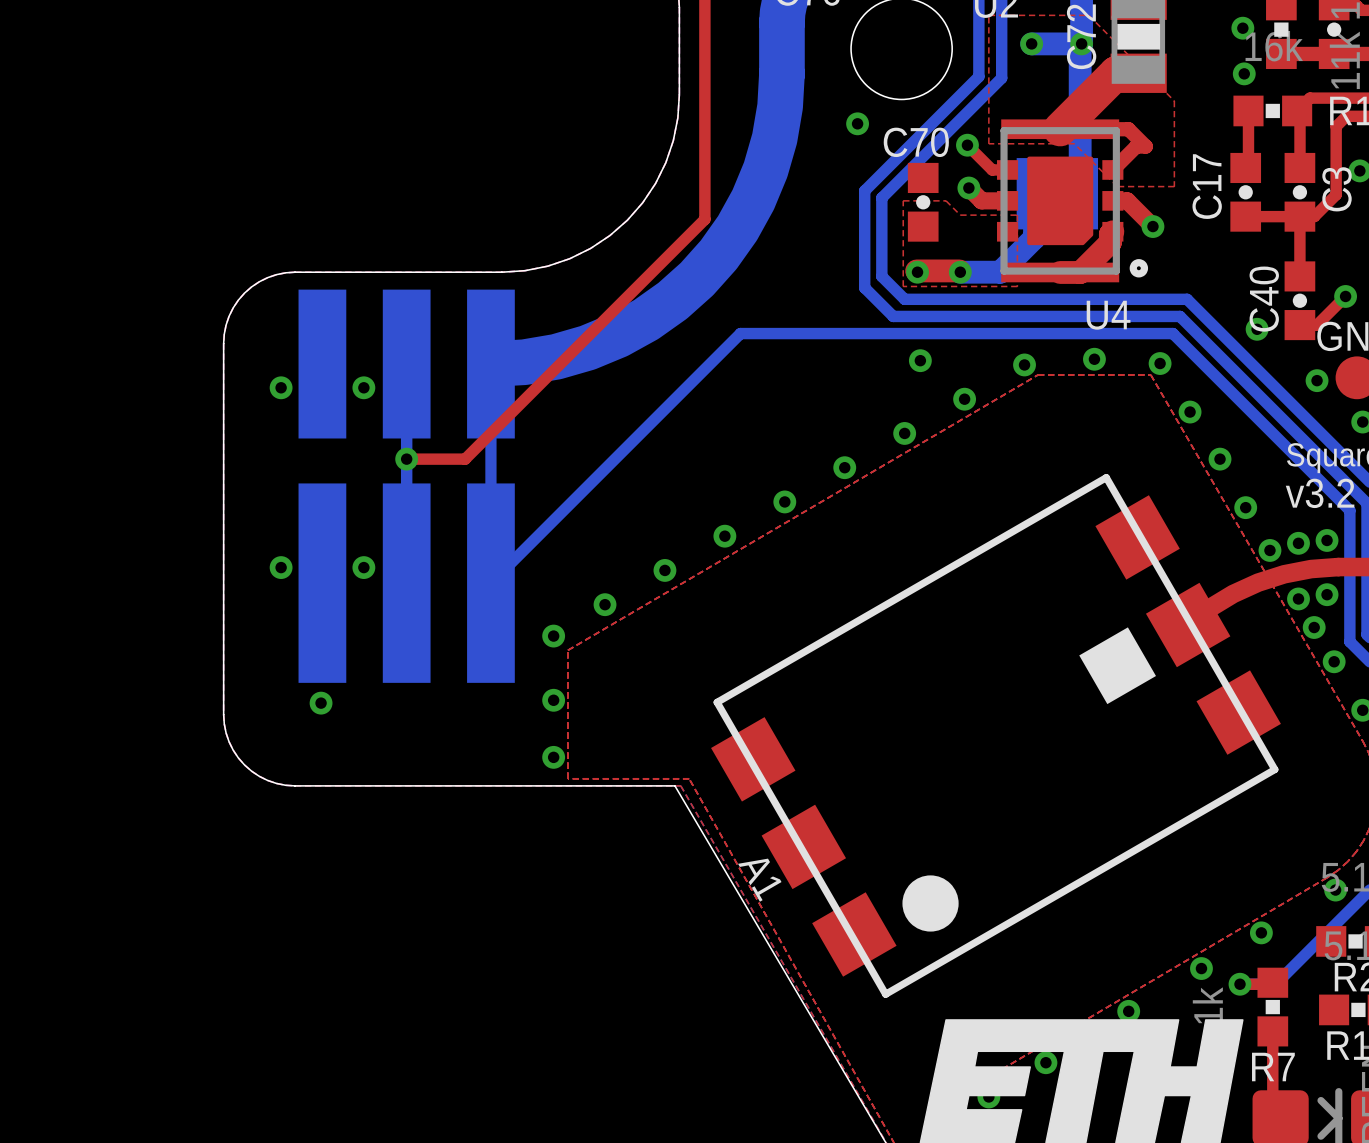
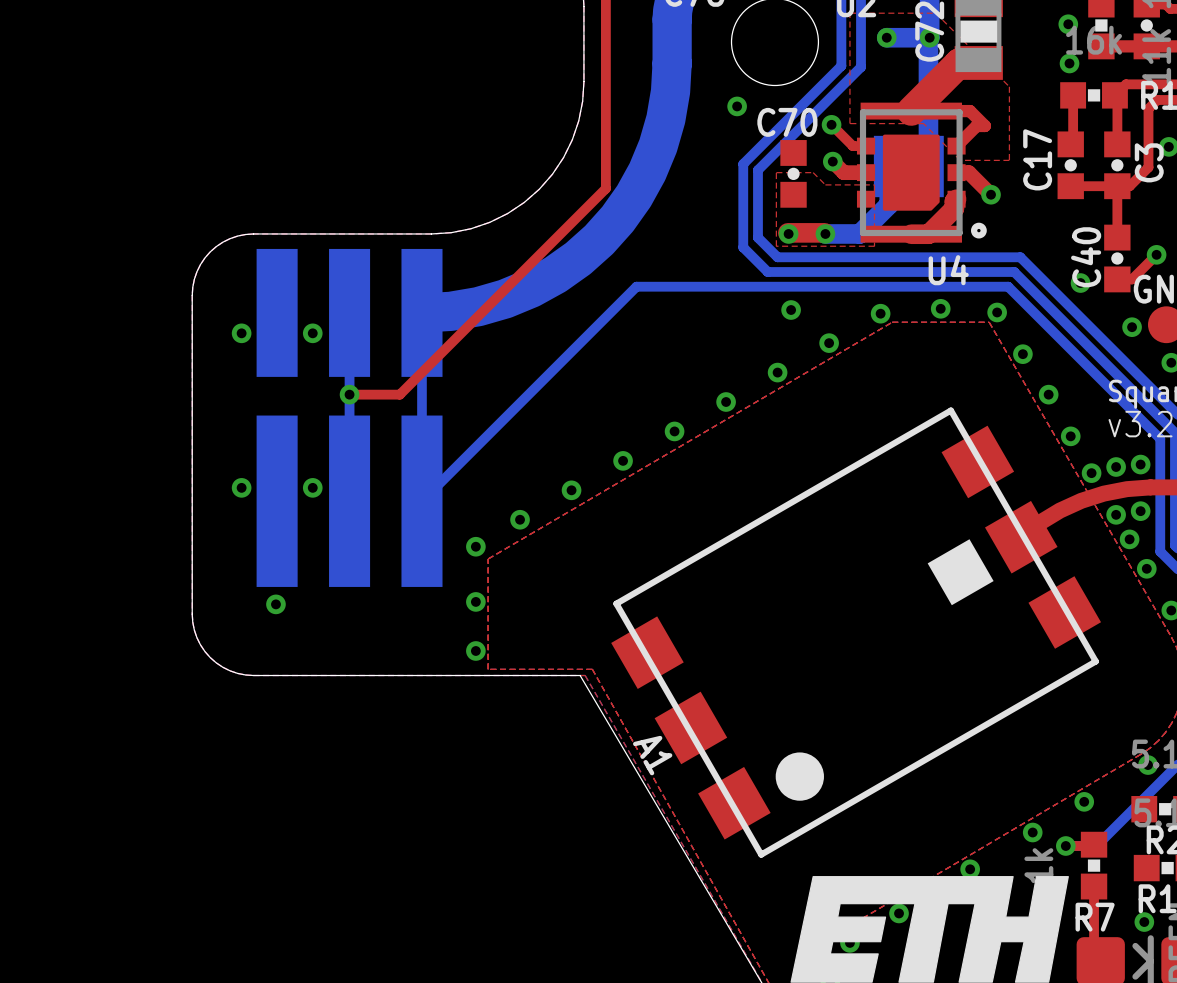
via: none -> (1144, 922)

